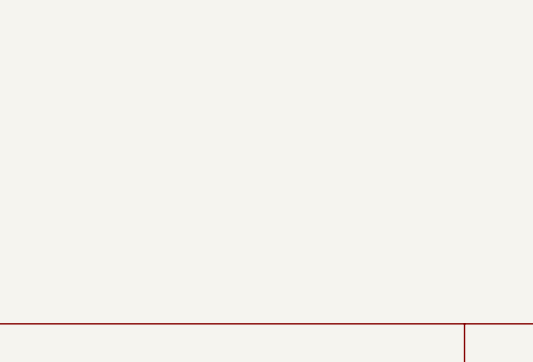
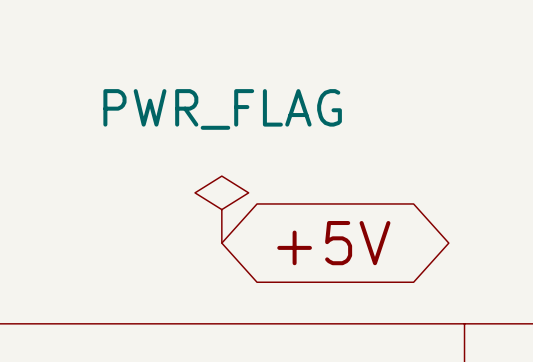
power symbol: none -> PWR_FLAG (221, 209)
global label: none -> +5V (333, 243)

